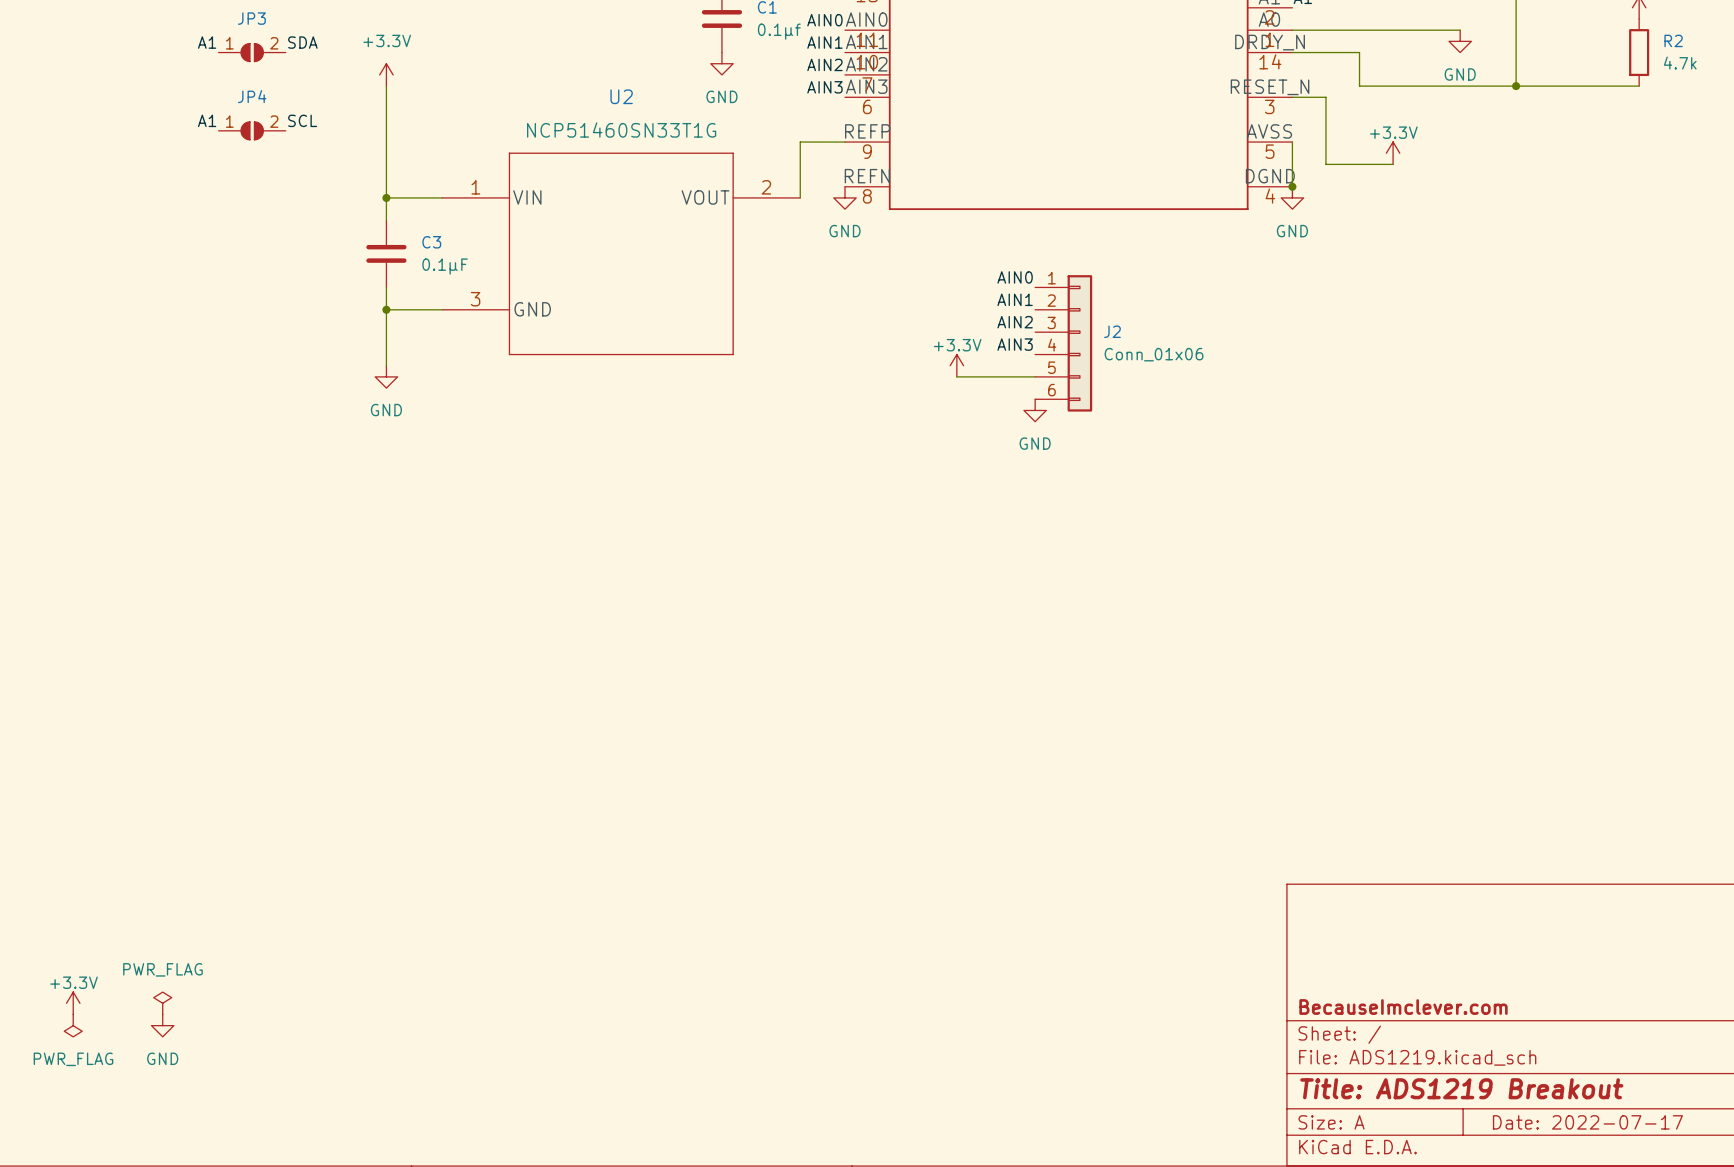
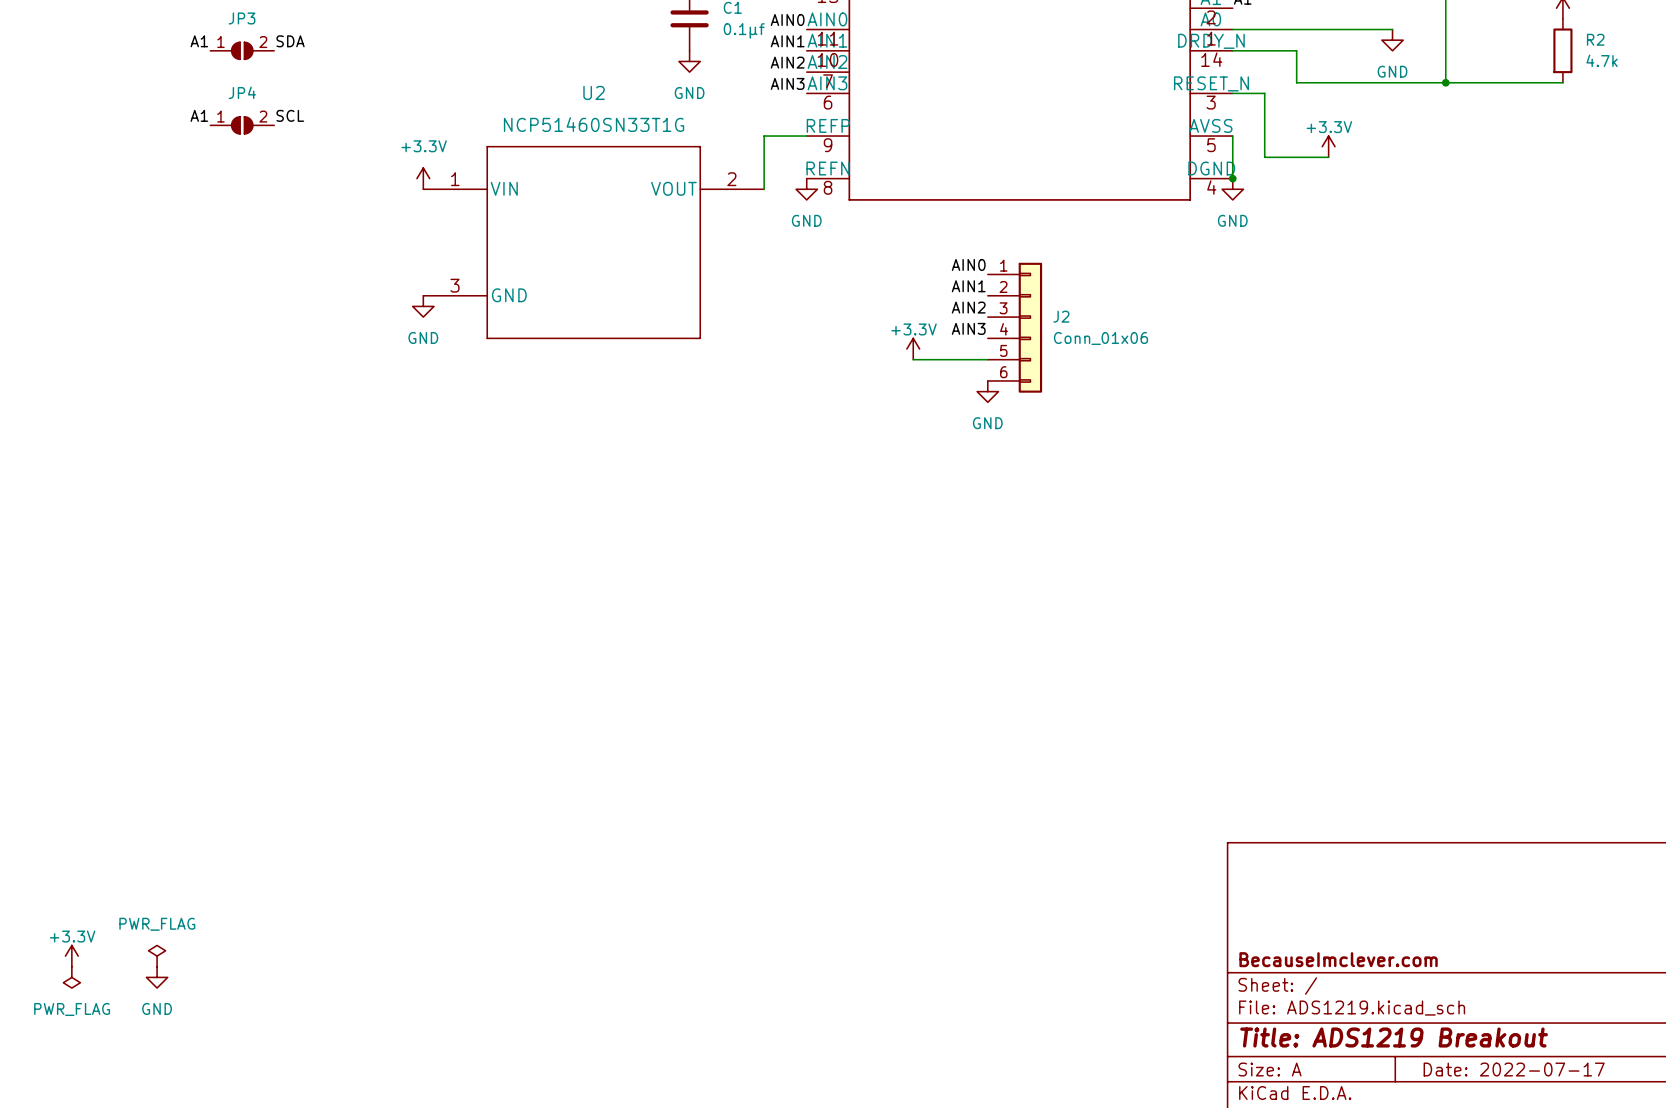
power symbol position: +3.3V (386, 74) -> +3.3V (423, 178)
wire: (386, 86) (386, 220) -> none
wire: (386, 197) (442, 197) -> none
junction: (386, 197) -> none
C3: 0.1μF (386, 253) -> none
wire: (386, 287) (386, 365) -> none
wire: (386, 309) (442, 309) -> none
junction: (386, 309) -> none
power symbol position: GND (386, 376) -> GND (423, 306)

